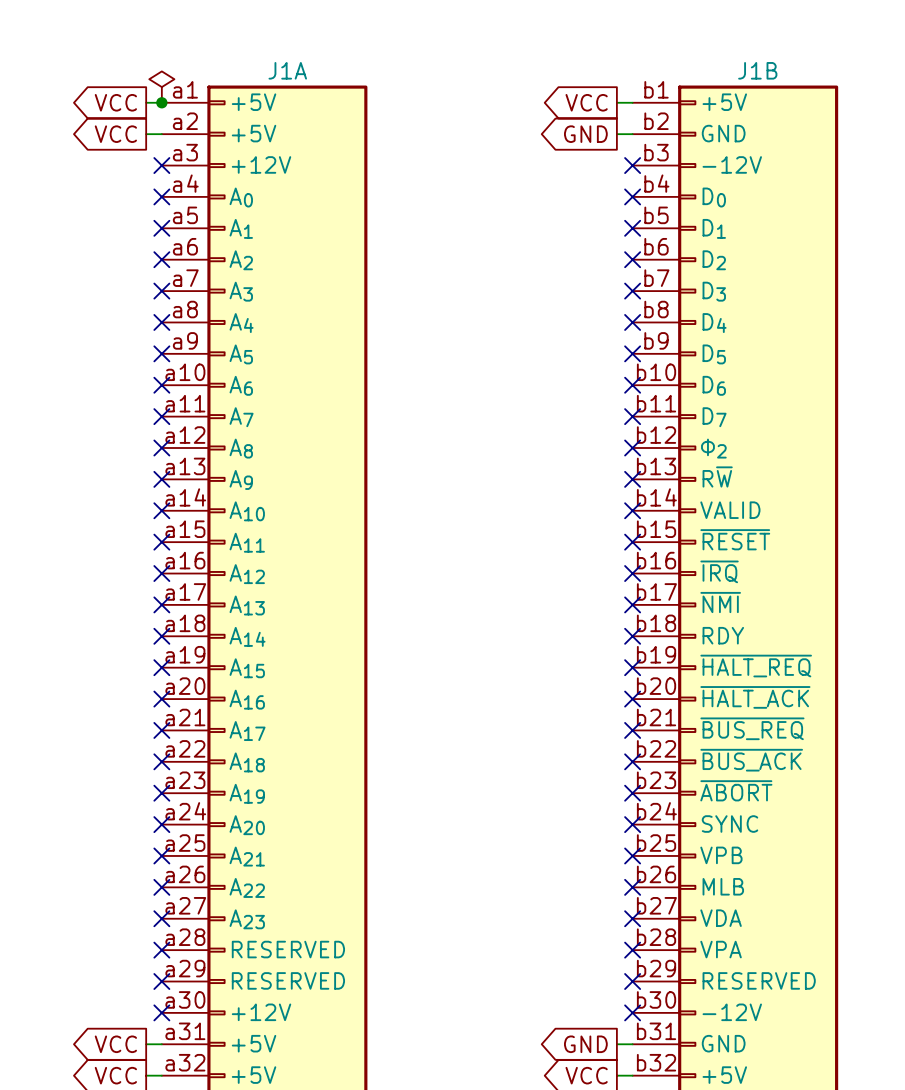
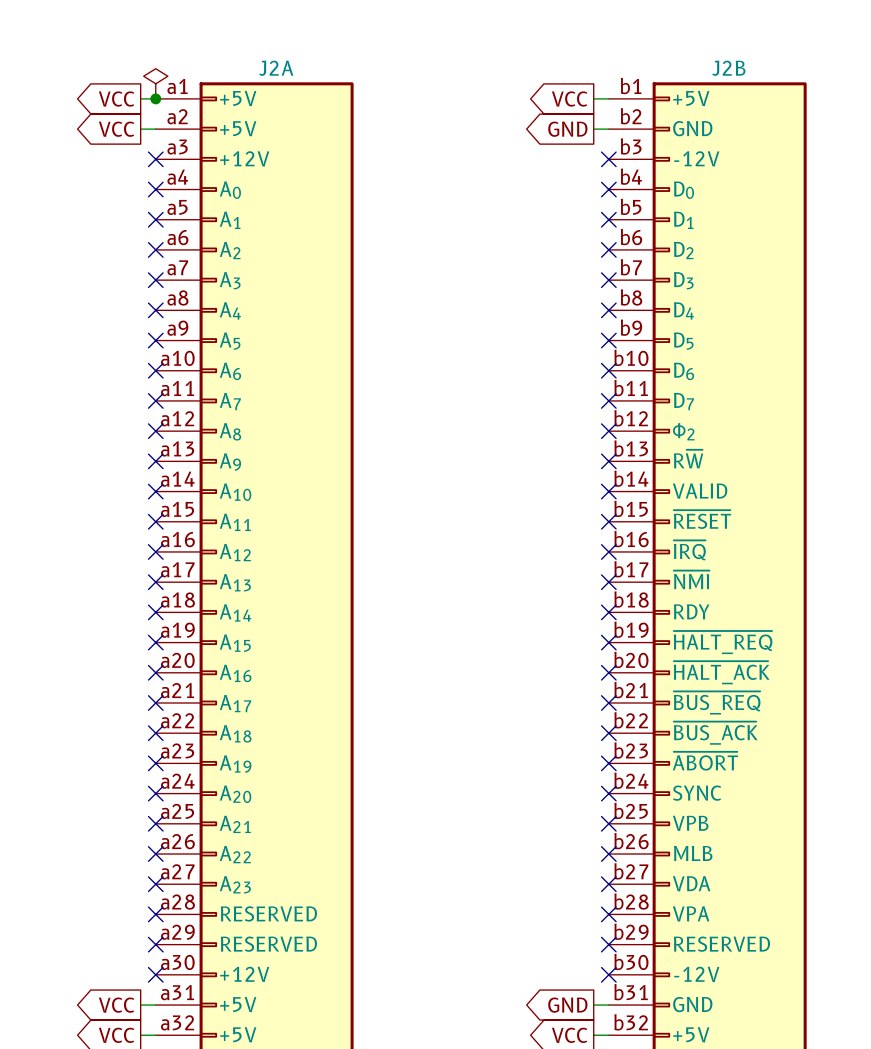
J1A name: J1A (287, 70) -> J2A (276, 68)
J1B name: J1B (757, 70) -> J2B (728, 68)

